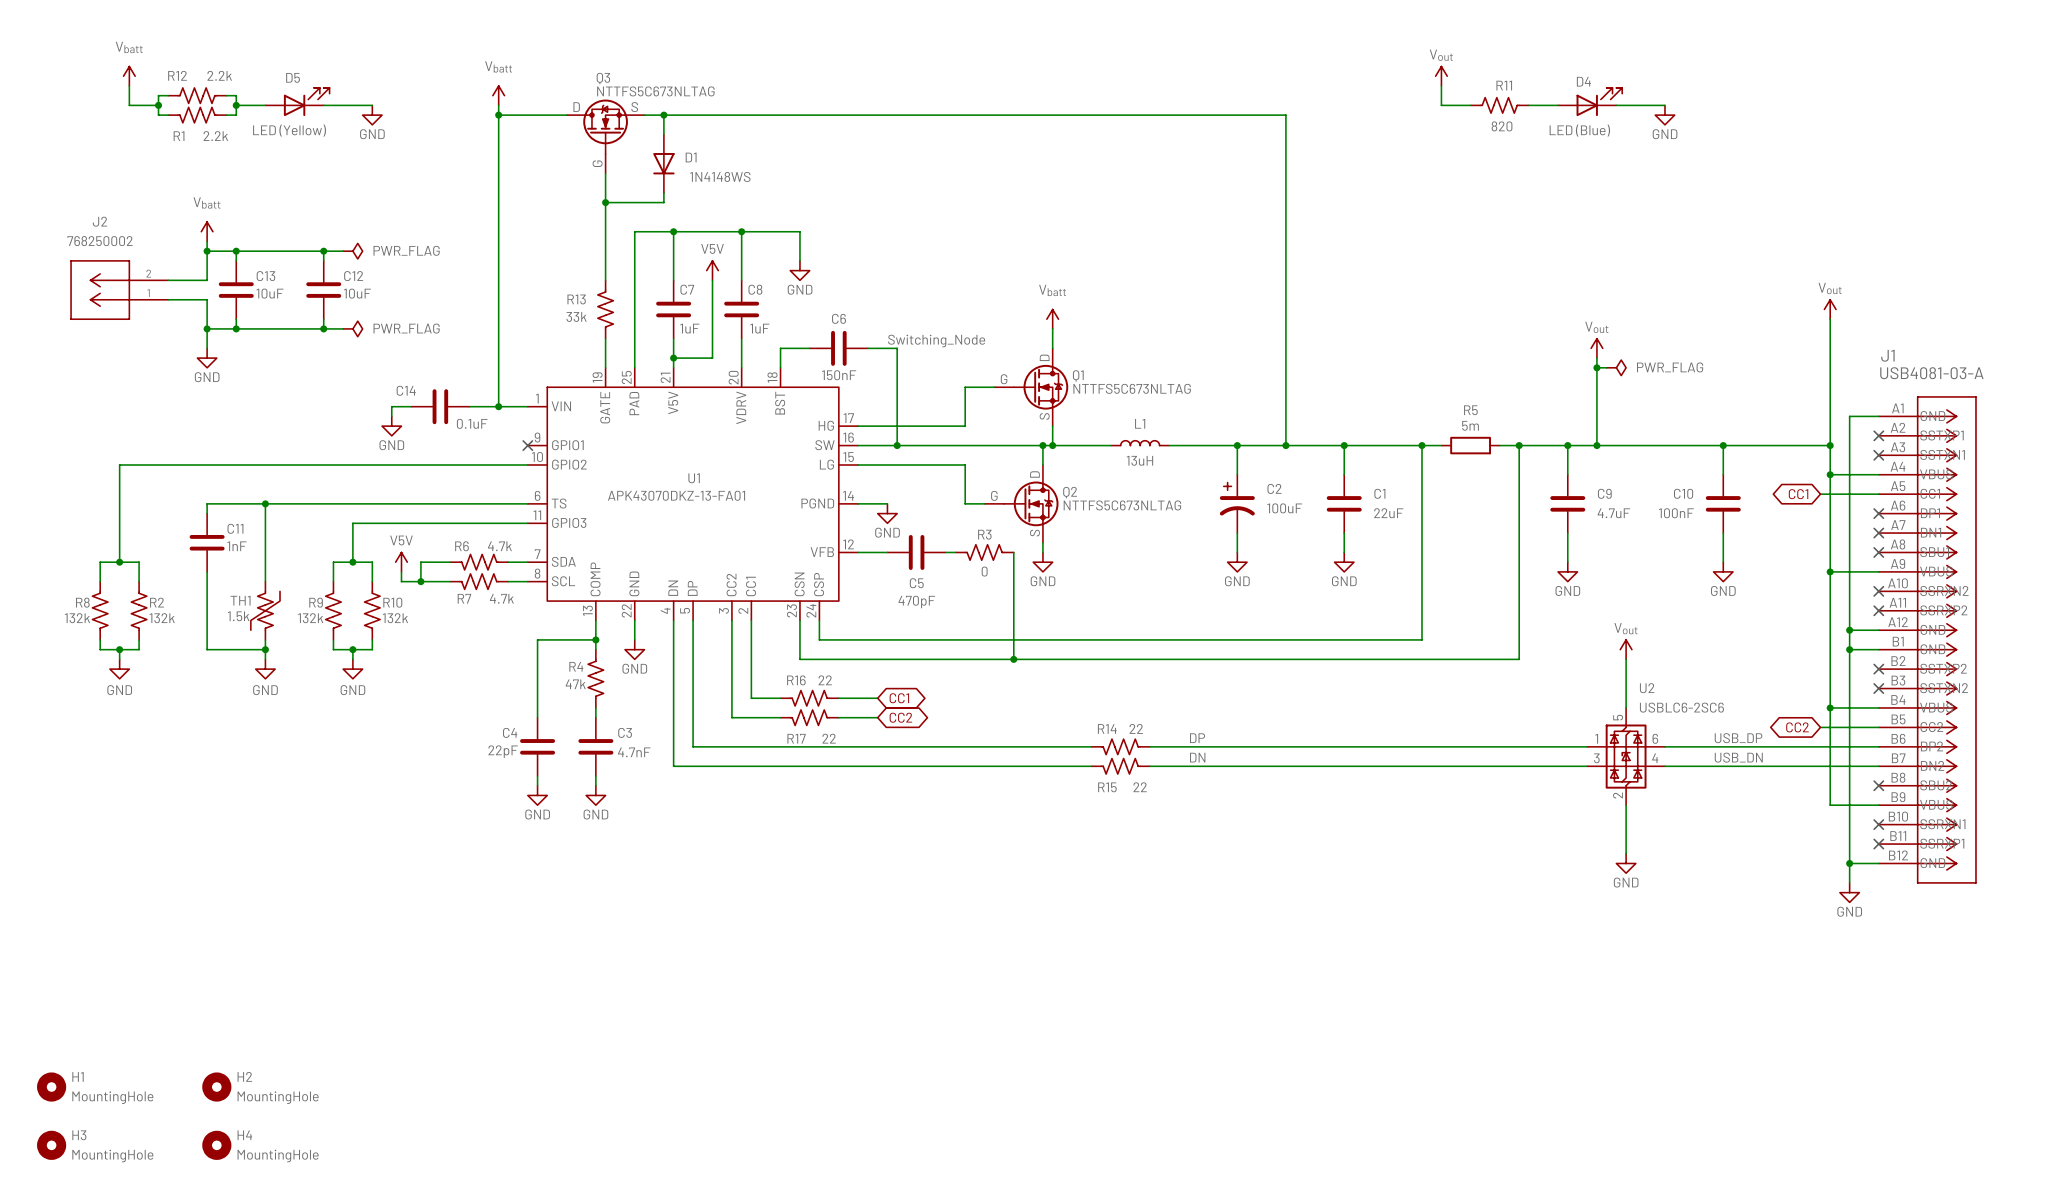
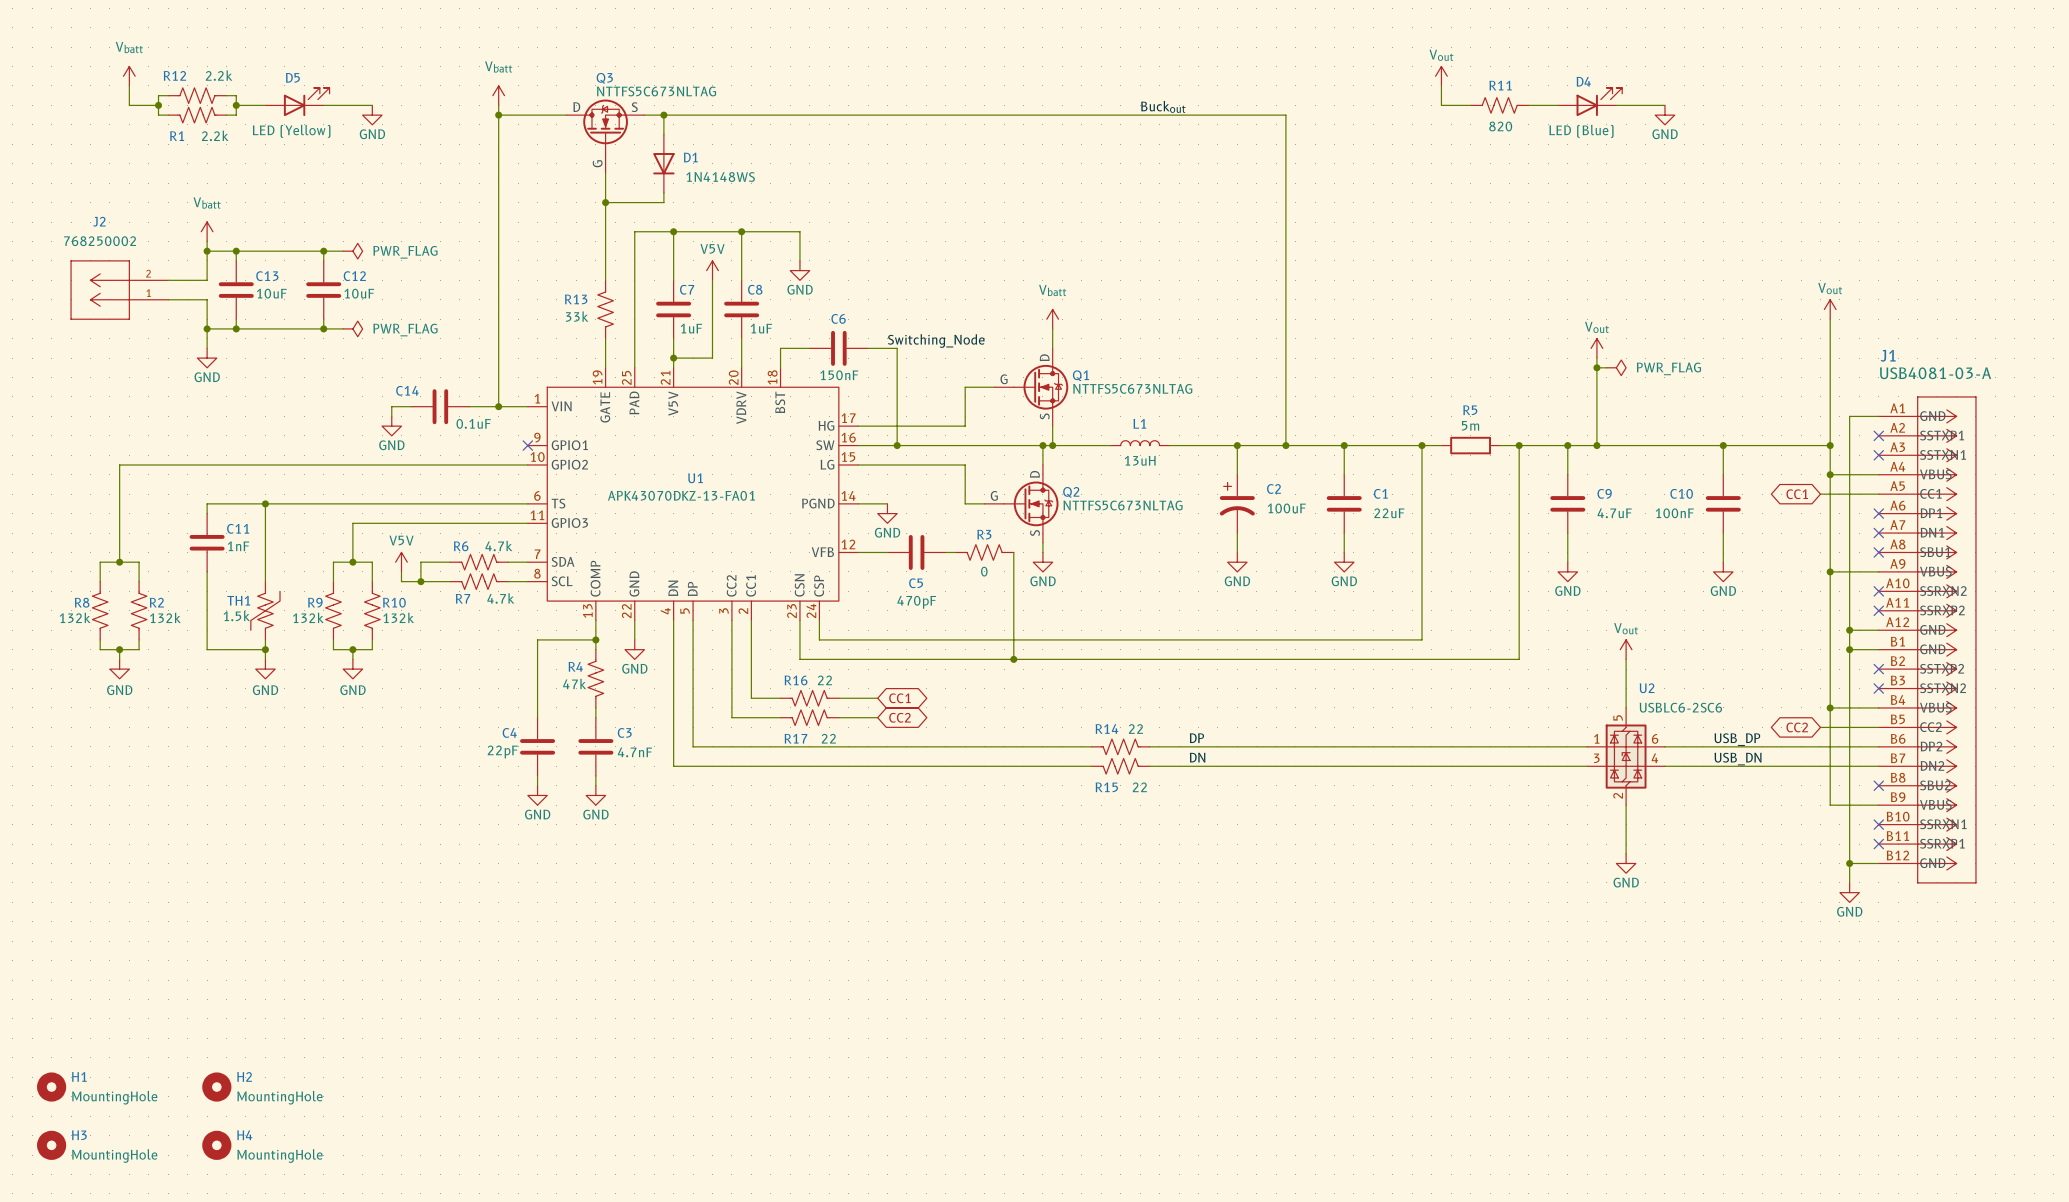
label: none -> Buckout (1163, 106)

